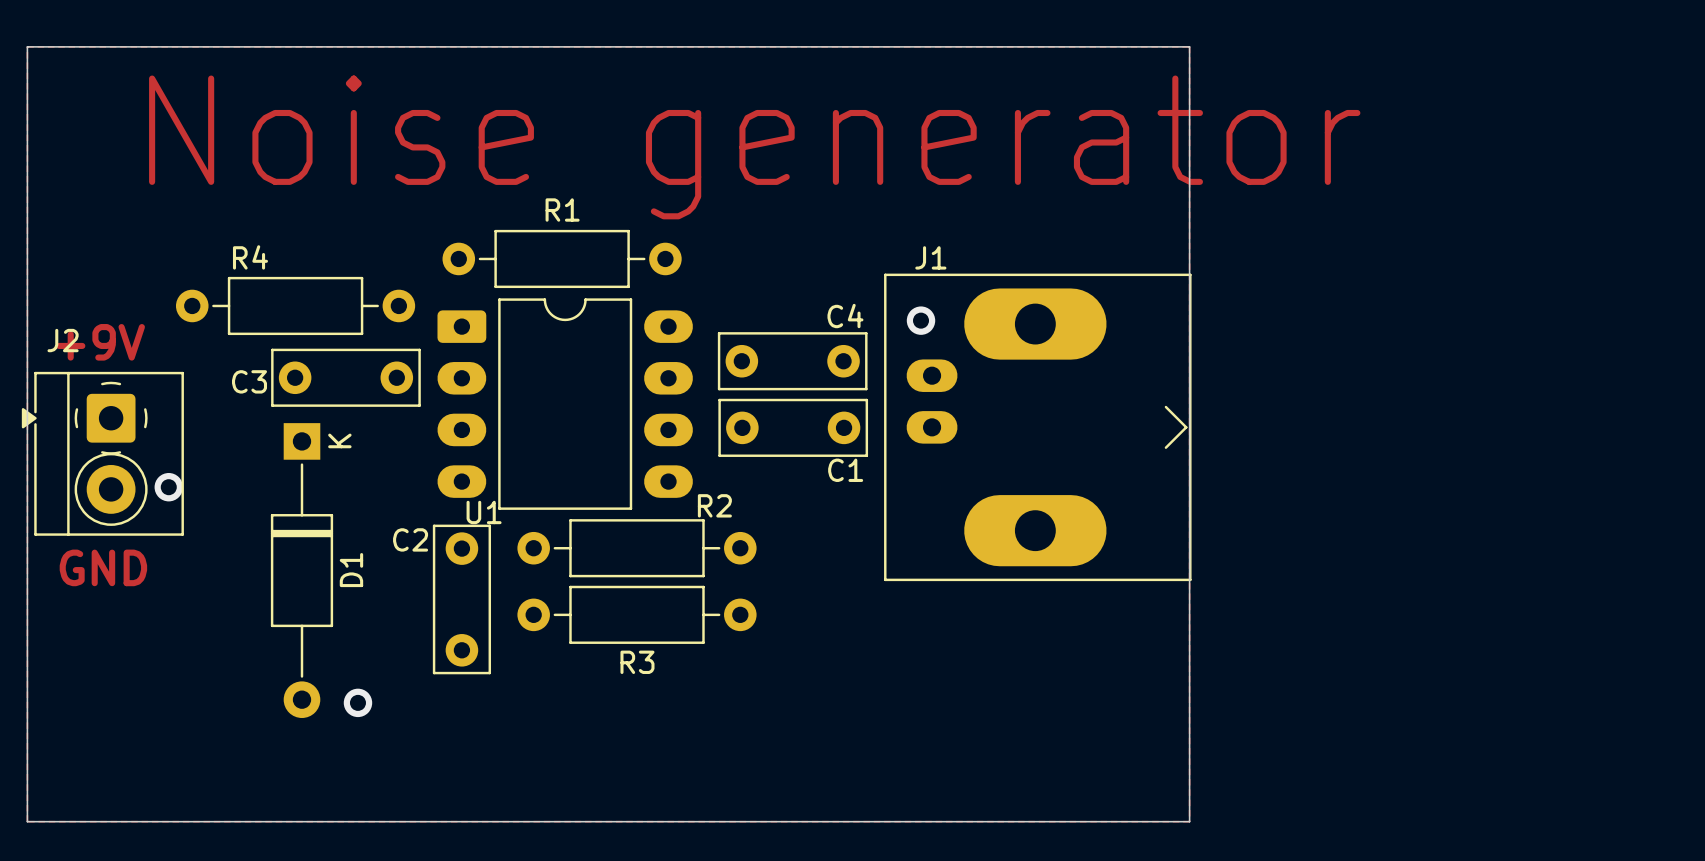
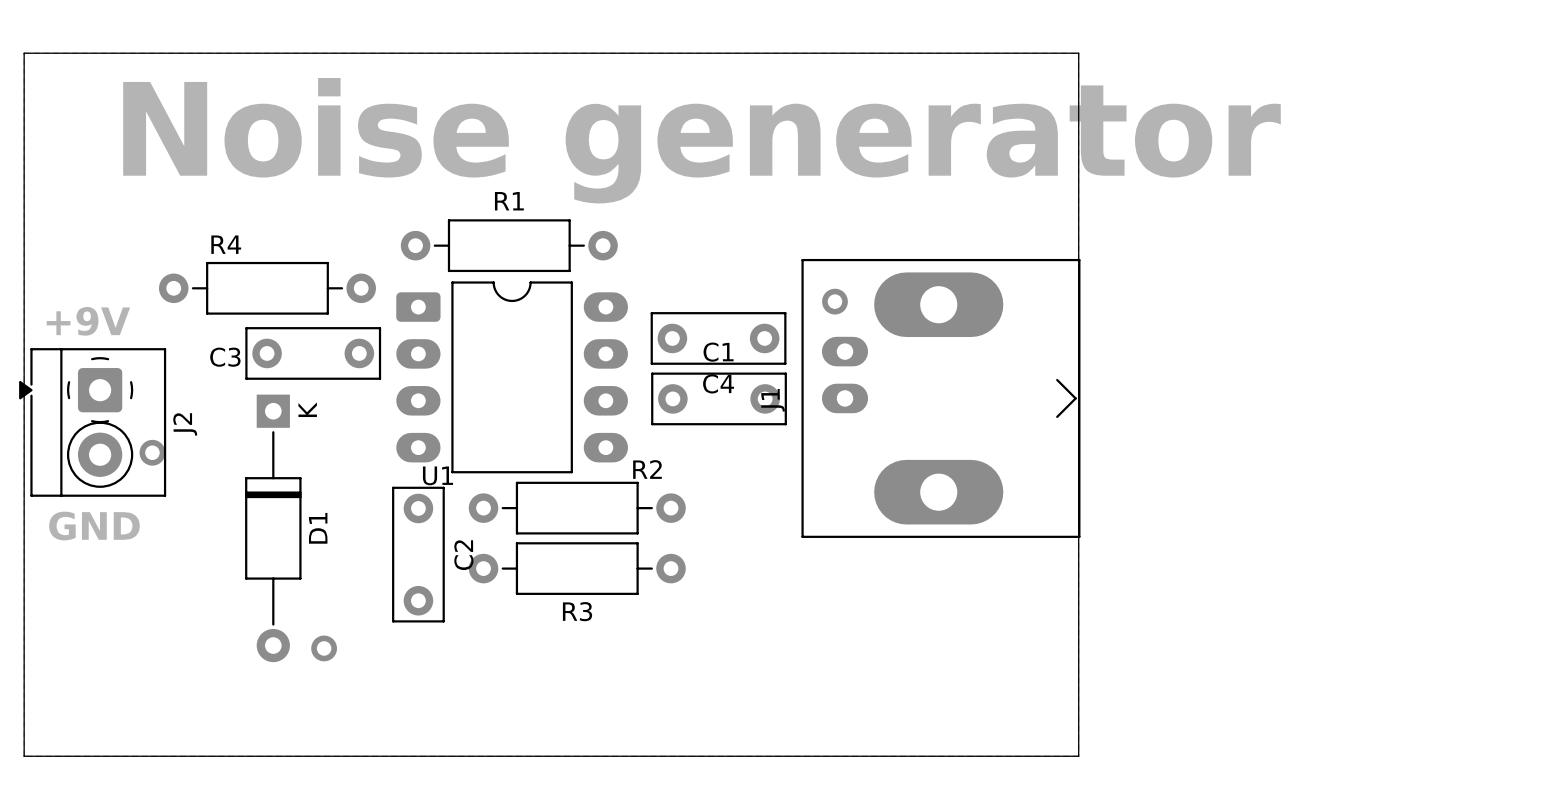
J1 name rotation: 0° (930, 257) -> 90° counterclockwise (773, 400)
J1 name position: J1 (930, 257) -> J1 (773, 400)
C4 name position: C4 (845, 316) -> C4 (718, 383)
J2 name rotation: 0° (63, 340) -> 90° counterclockwise (185, 424)
J2 name position: J2 (63, 340) -> J2 (185, 424)
C1 name position: C1 (845, 470) -> C1 (718, 352)
C2 name rotation: 0° (410, 539) -> 90° counterclockwise (463, 555)
C2 name position: C2 (410, 539) -> C2 (463, 555)

